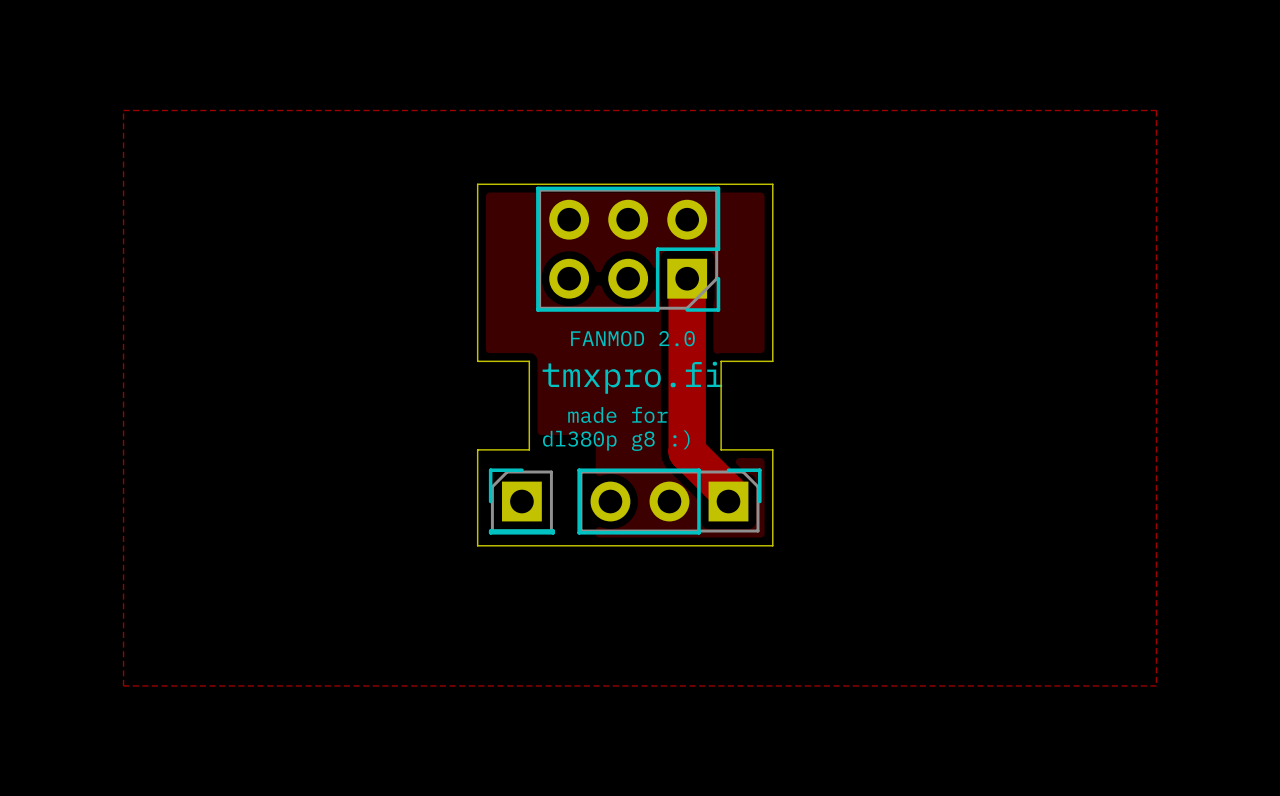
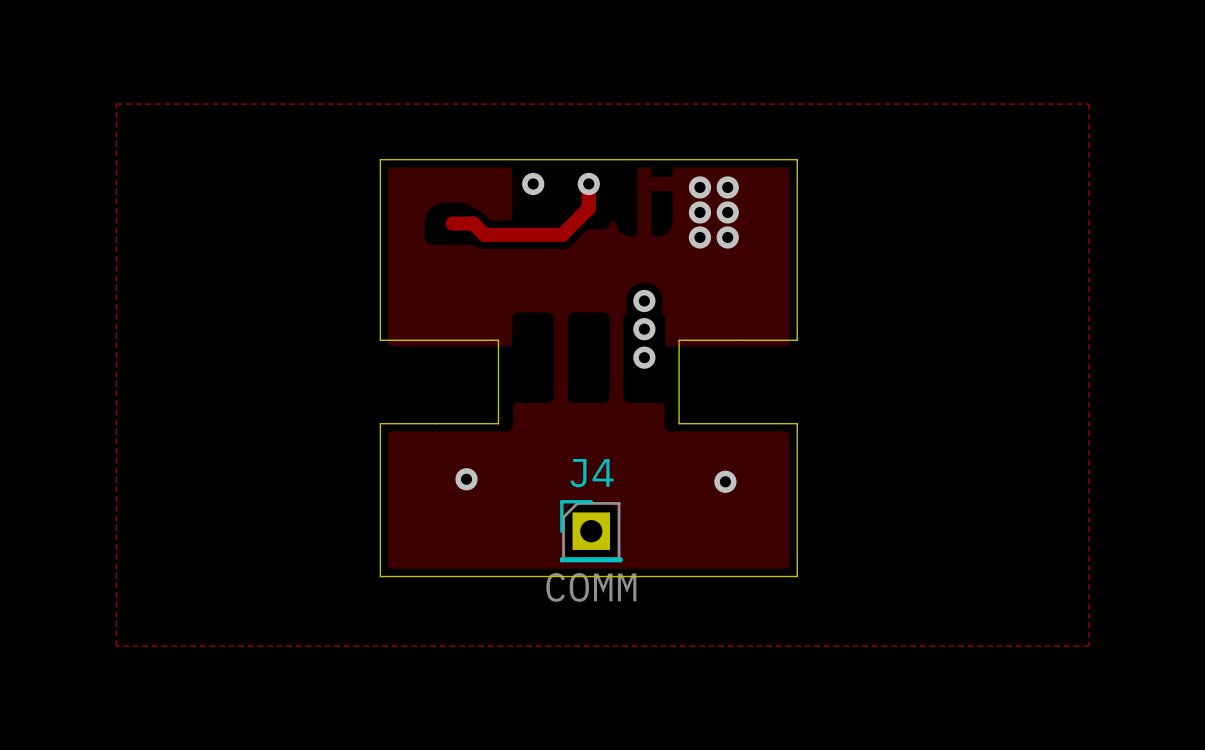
via: none -> (533, 183)
track: none -> (588, 183) (588, 208) (562, 234) (484, 234) (473, 223) (452, 223)
via: none -> (588, 183)
via: none -> (699, 187)
via: none -> (727, 187)
via: none -> (699, 212)
via: none -> (727, 212)
part: (628, 249) -> none
via: none -> (699, 237)
via: none -> (727, 237)
track: (687, 278) (687, 451) (728, 493) (728, 501) -> none
via: none -> (644, 300)
text: FANMOD 2.0 (632, 338) -> none
via: none -> (644, 329)
board edge: (477, 361) (477, 184) (772, 184) (772, 361) -> (449, 340) (380, 340) (380, 159) (797, 159) (797, 340) (727, 340)
text: tmxpro.fi (632, 377) -> none
via: none -> (644, 357)
text: made for (617, 415) -> none
text: dl380p g8 :) (616, 440) -> none
board edge: (477, 449) (477, 545) (772, 545) (772, 449) -> (449, 423) (380, 423) (380, 576) (797, 576) (797, 423) (727, 423)
part: (521, 501) -> none
part: (669, 501) -> none
via: none -> (466, 479)
via: none -> (725, 481)
J4: none -> COMM (591, 531)

